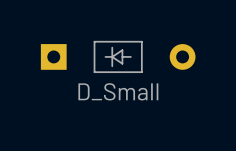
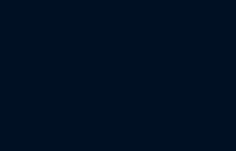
part: D_Small (118, 56) -> none

